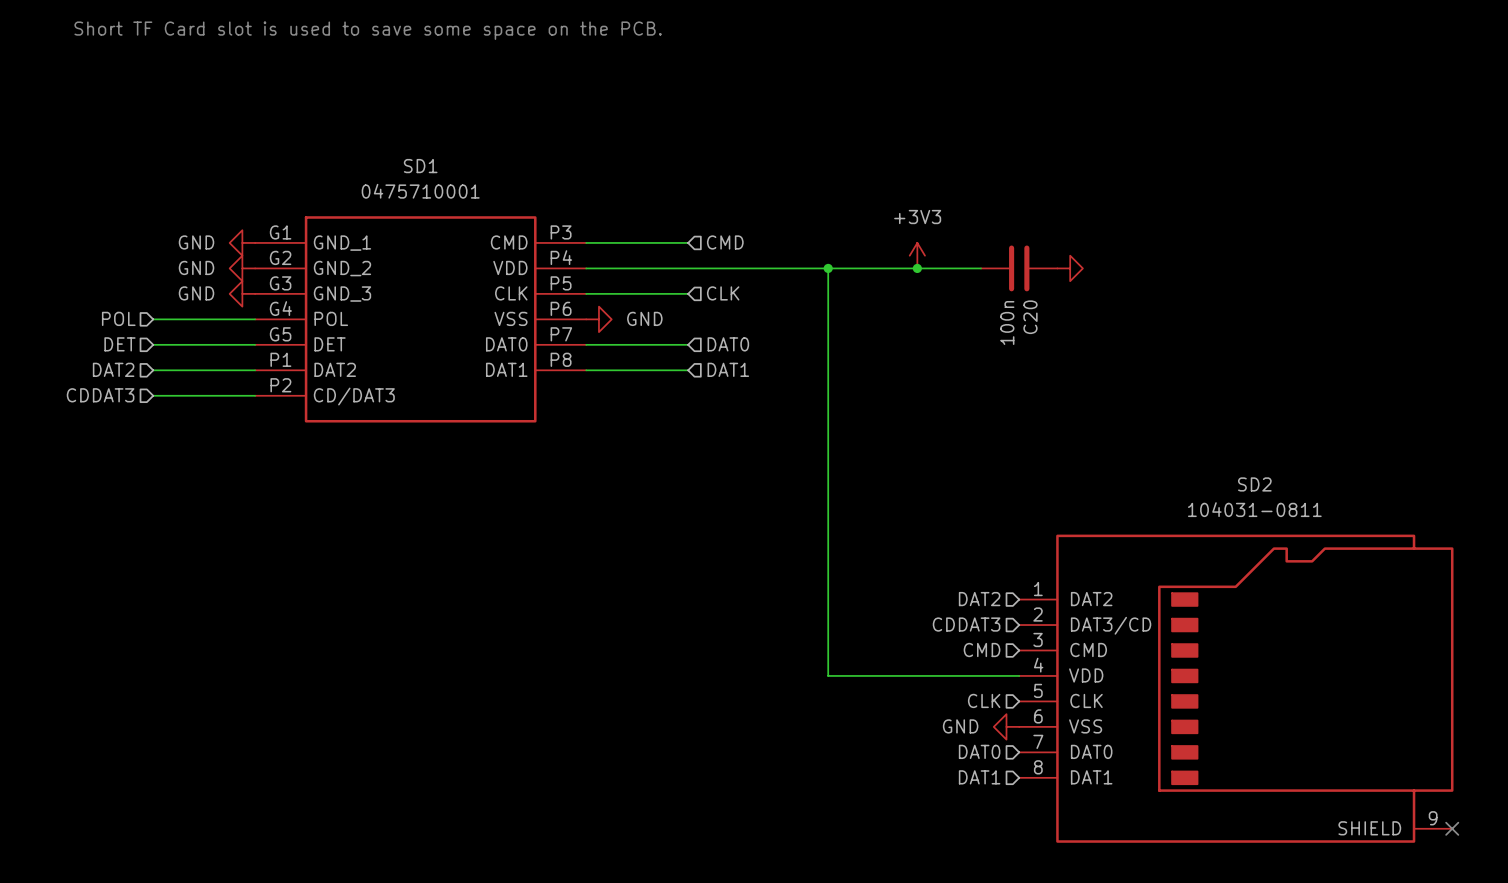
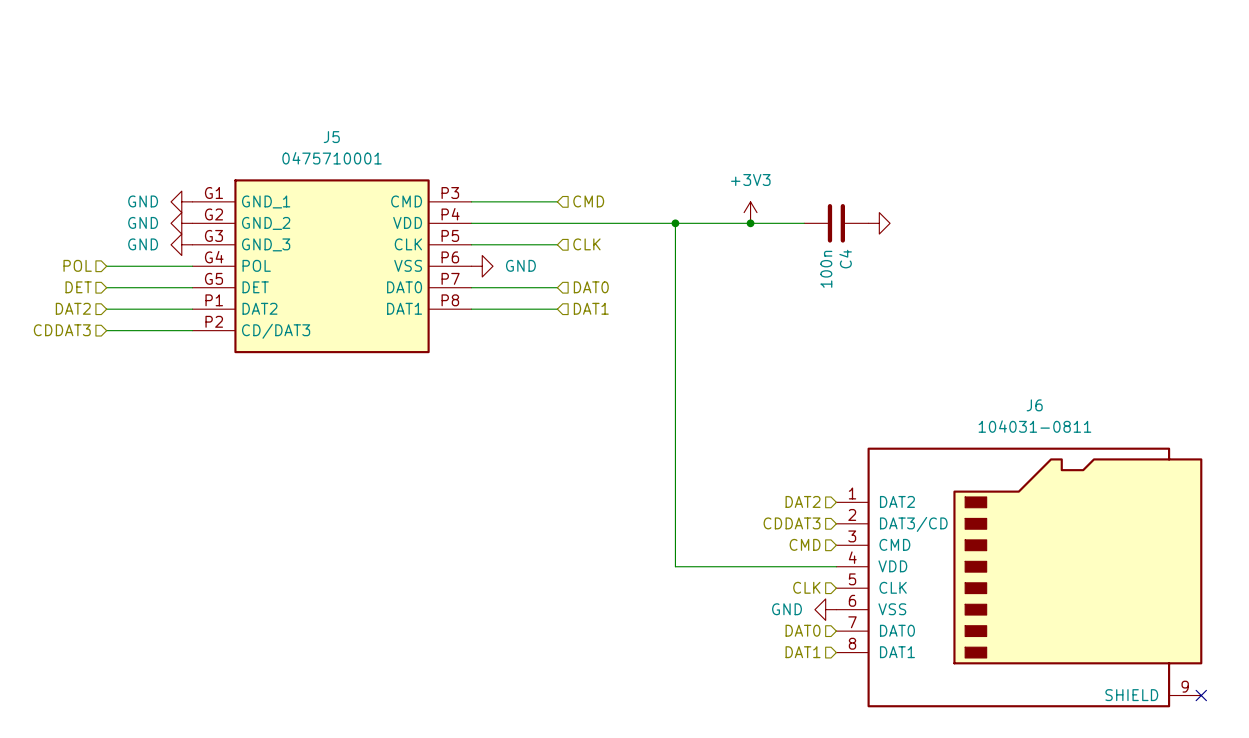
text: Short TF Card slot is used to save some space on the PCB. (368, 30) -> none
SD1 name: SD1 (420, 166) -> J5 (331, 137)
C20 name: C20 (1030, 317) -> C4 (845, 259)
SD2 name: SD2 (1254, 484) -> J6 (1034, 405)

